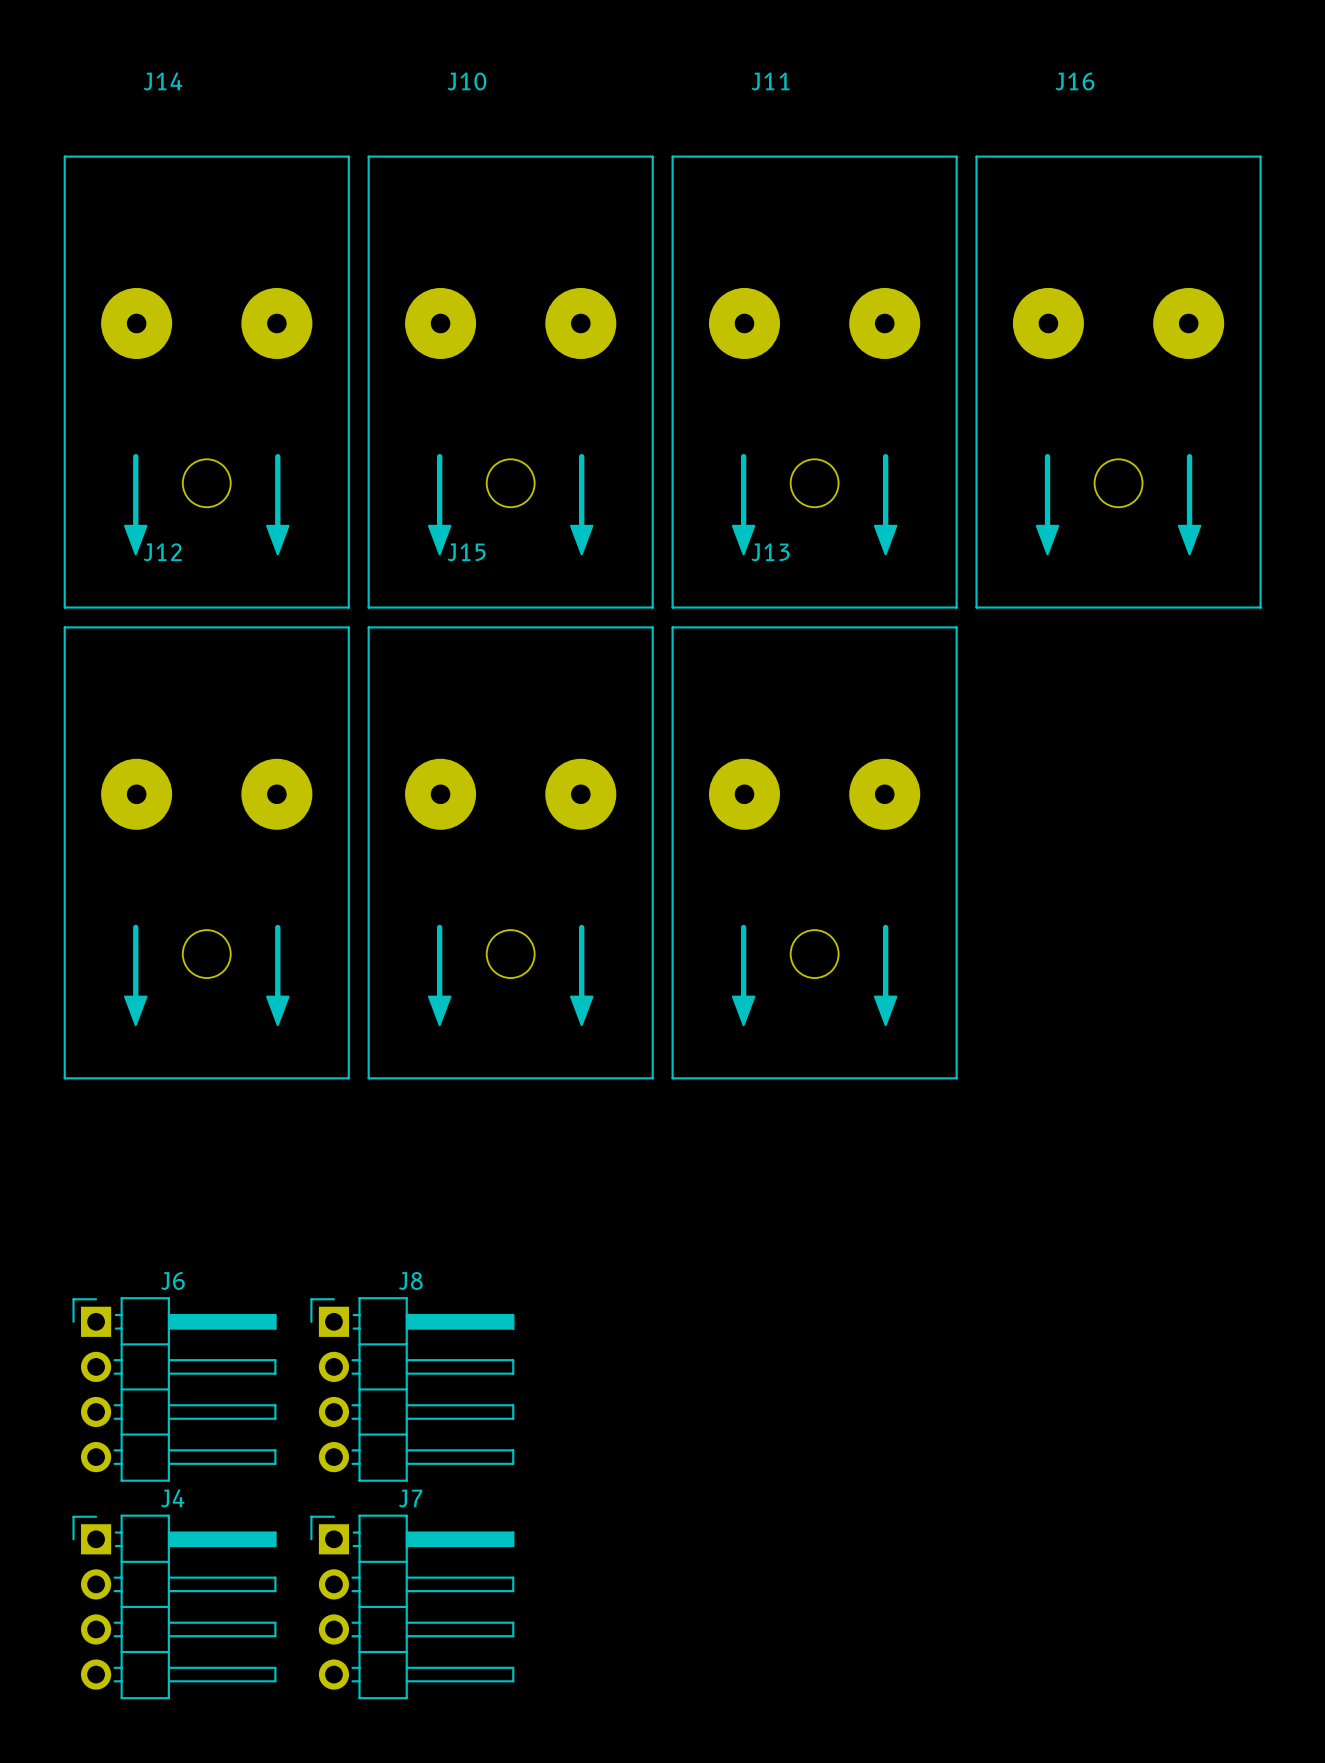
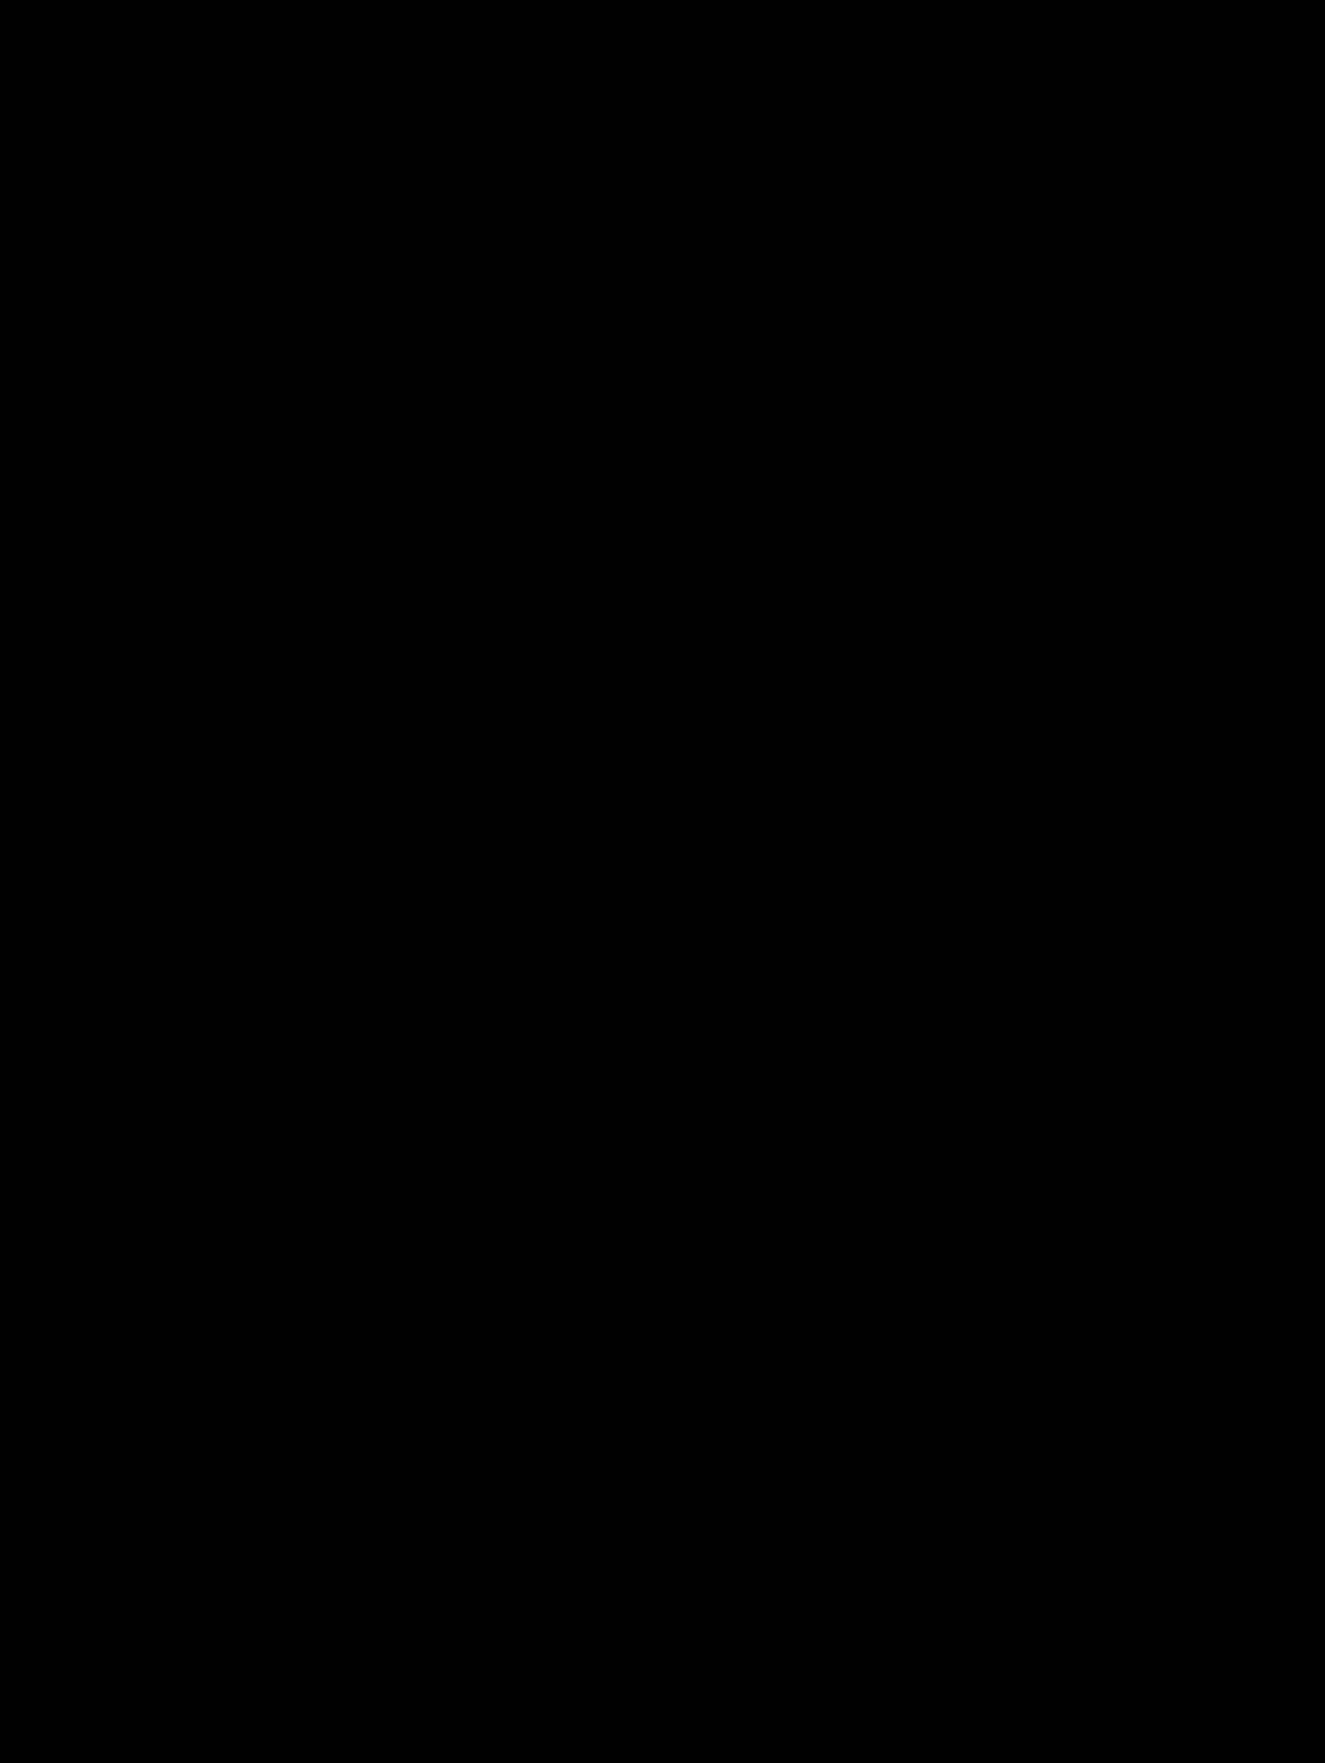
J14: (206, 382) -> none
J10: (510, 382) -> none
J11: (814, 382) -> none
J16: (1118, 382) -> none
J12: (206, 852) -> none
J15: (510, 852) -> none
J13: (814, 852) -> none
J6: (174, 1389) -> none
J8: (412, 1389) -> none
J4: (174, 1606) -> none
J7: (412, 1606) -> none

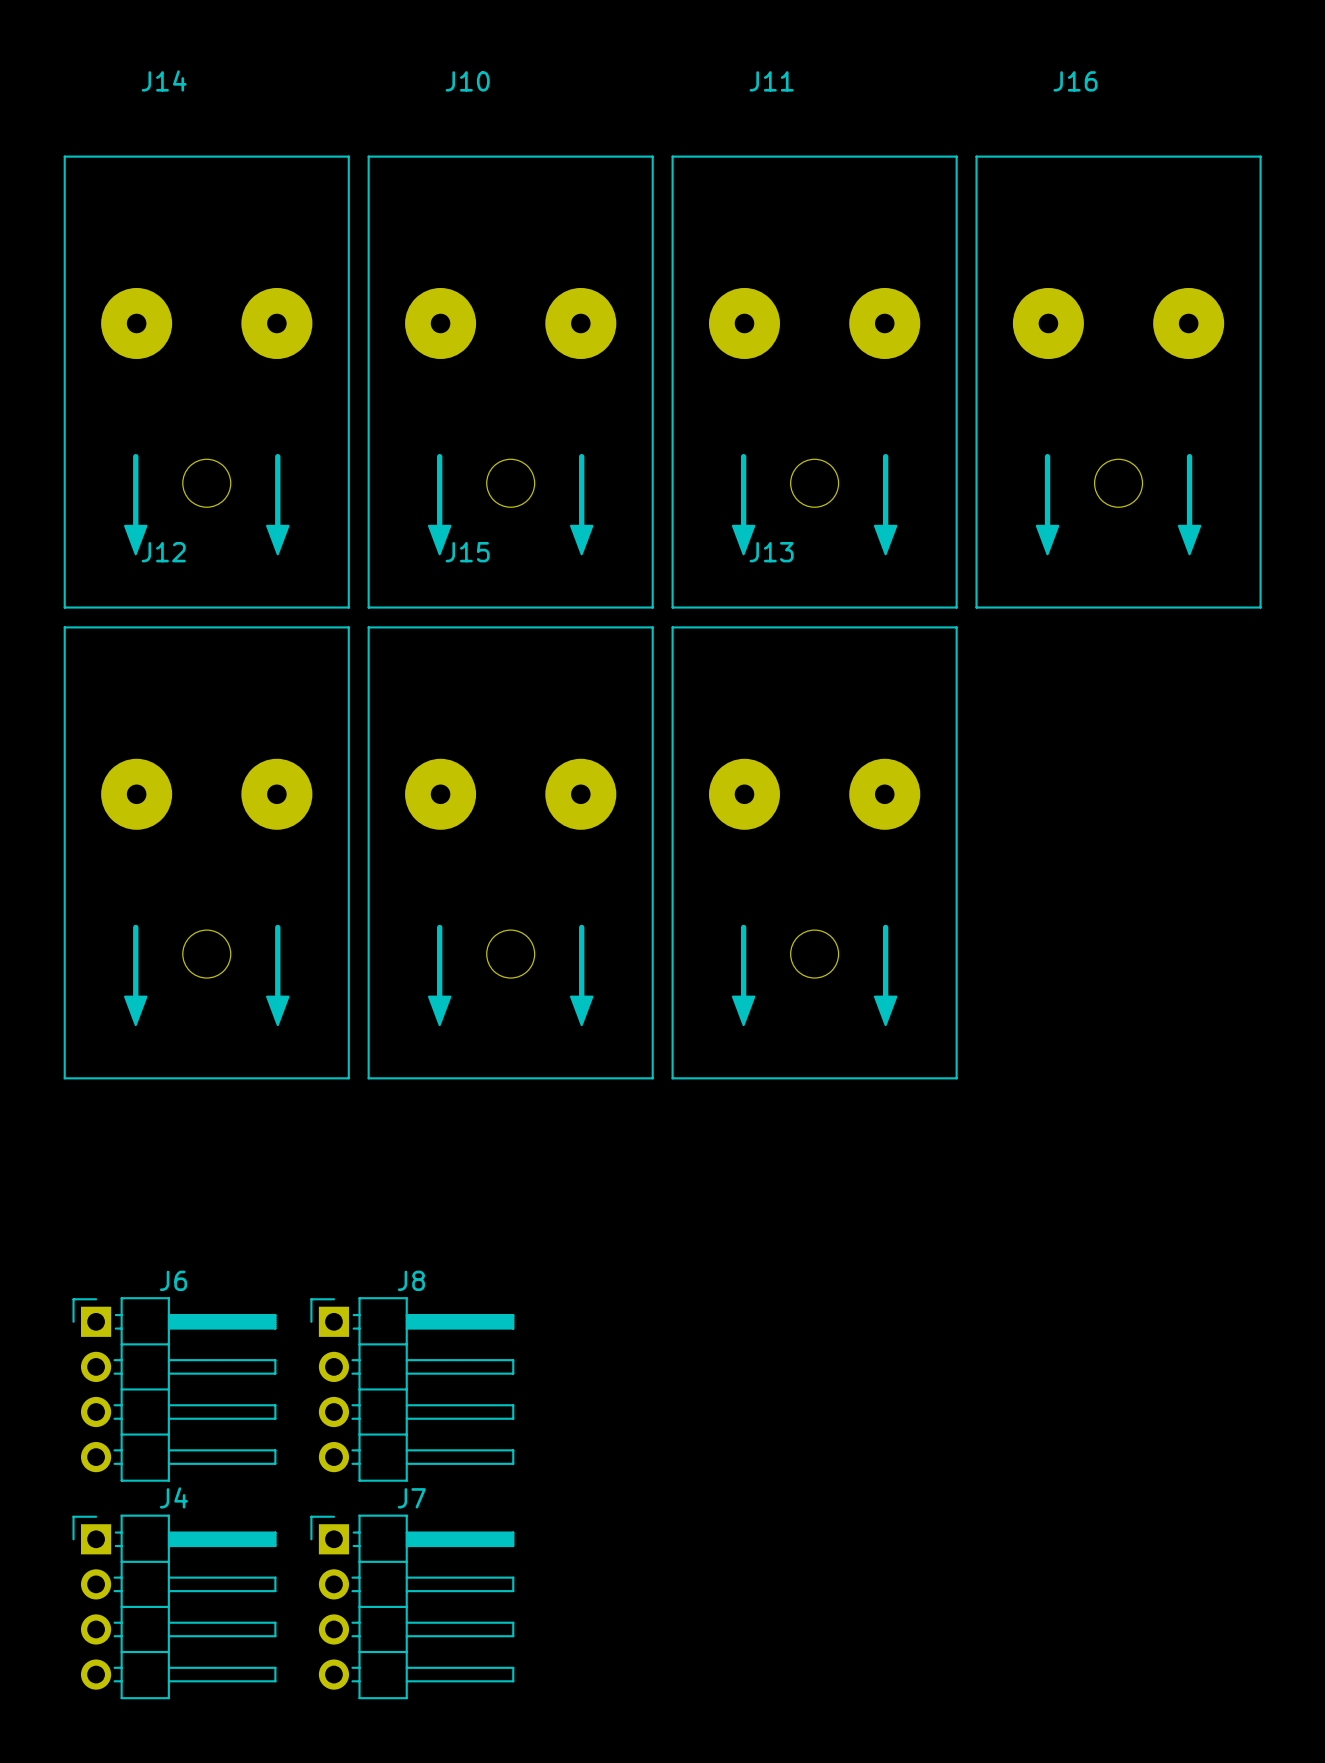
J14: none -> (206, 382)
J10: none -> (510, 382)
J11: none -> (814, 382)
J16: none -> (1118, 382)
J12: none -> (206, 852)
J15: none -> (510, 852)
J13: none -> (814, 852)
J6: none -> (174, 1389)
J8: none -> (412, 1389)
J4: none -> (174, 1606)
J7: none -> (412, 1606)

